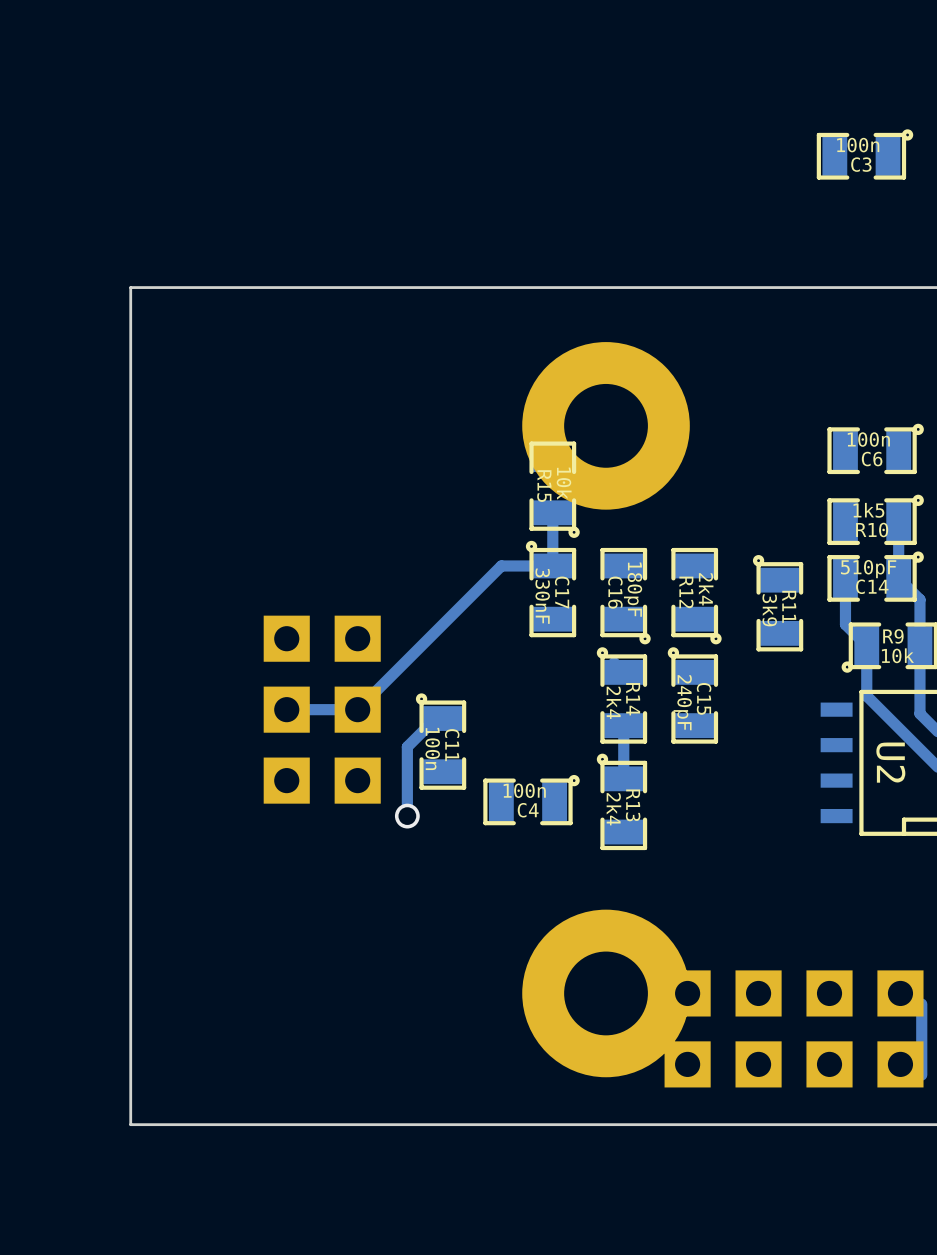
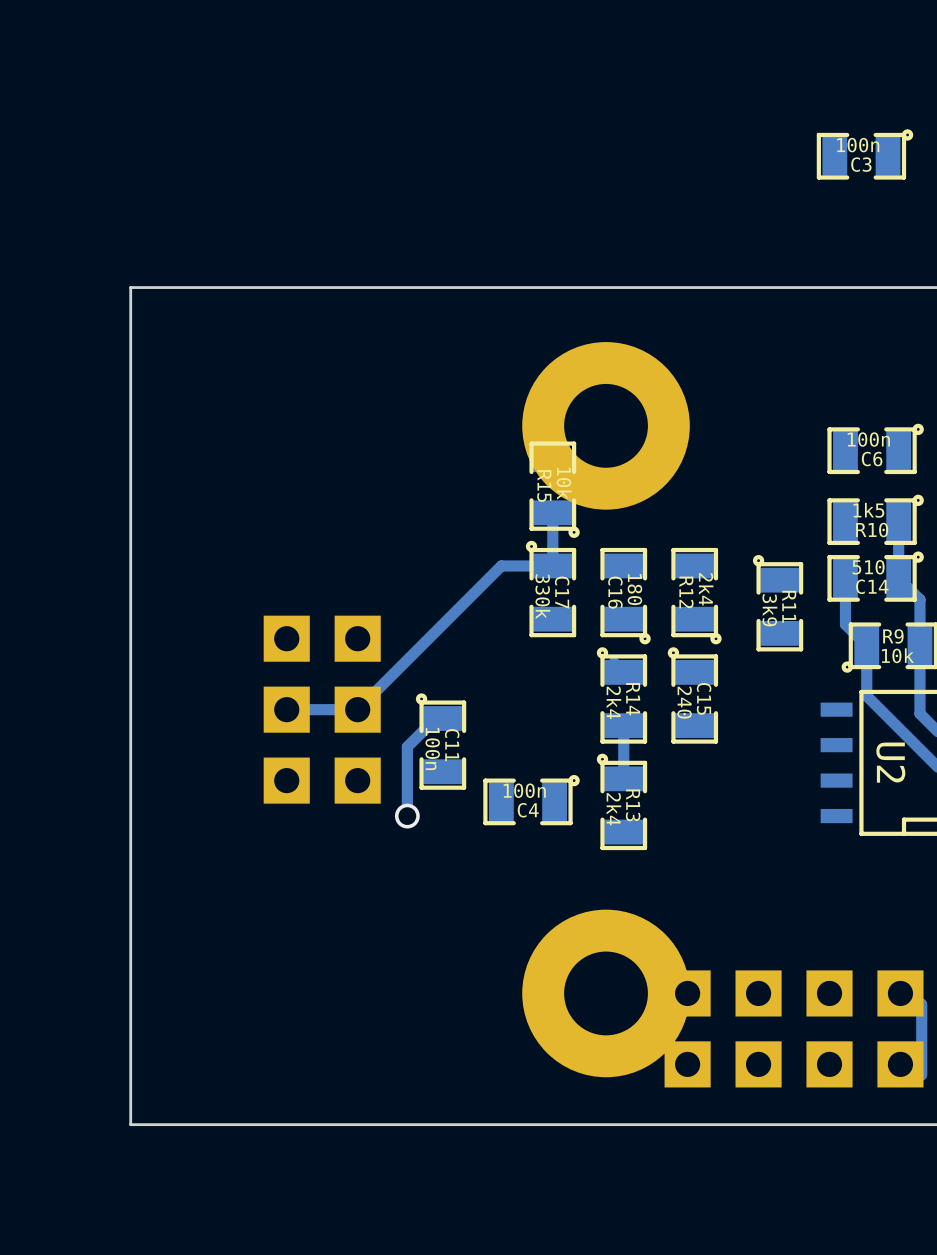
C14 value: 510pF (868, 569) -> 510 (868, 567)
C16 value: 180pF (633, 589) -> 180 (634, 589)
C17 value: 330nF (542, 596) -> 330k (542, 596)
C15 value: 240pF (682, 702) -> 240 (684, 702)

